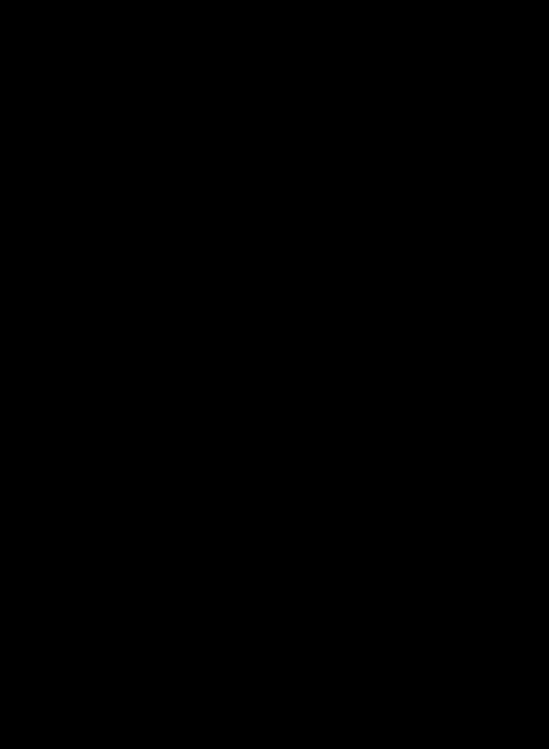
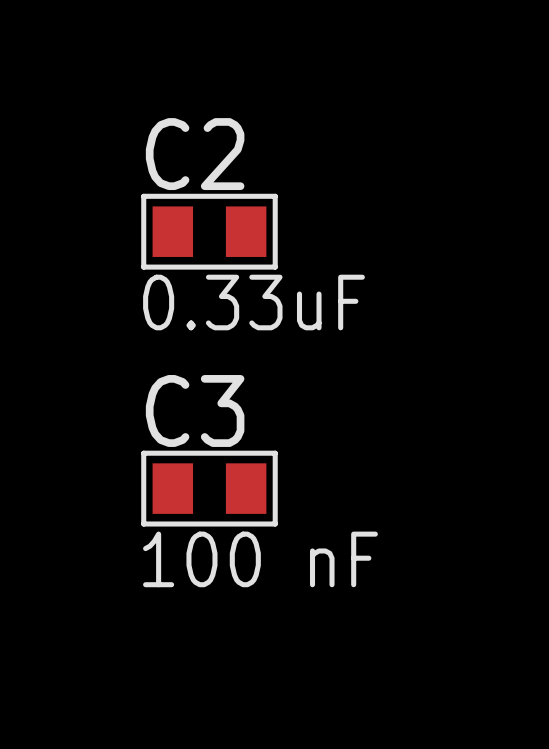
C2: none -> 0.33uF (209, 231)
C3: none -> 100 nF (209, 488)

